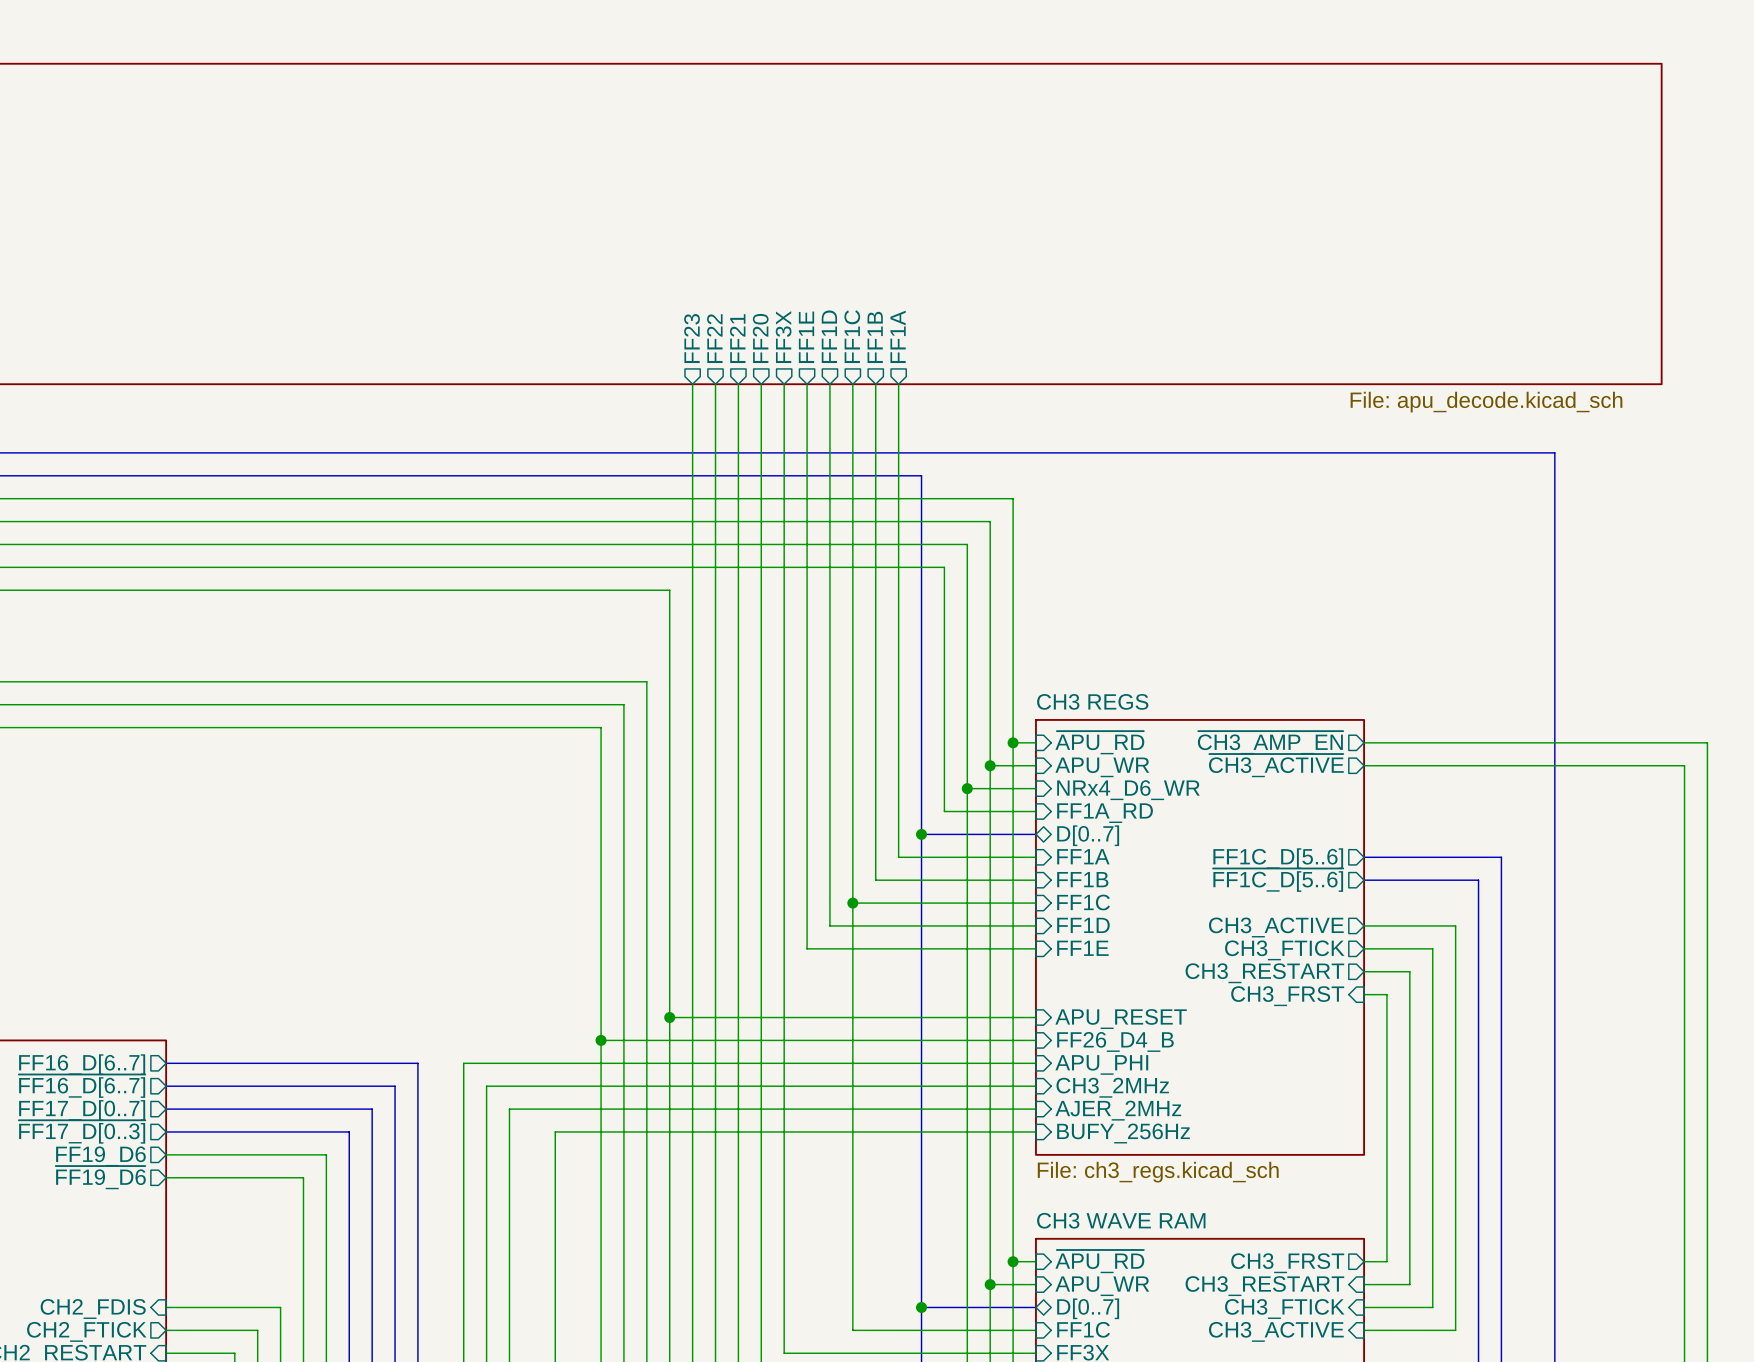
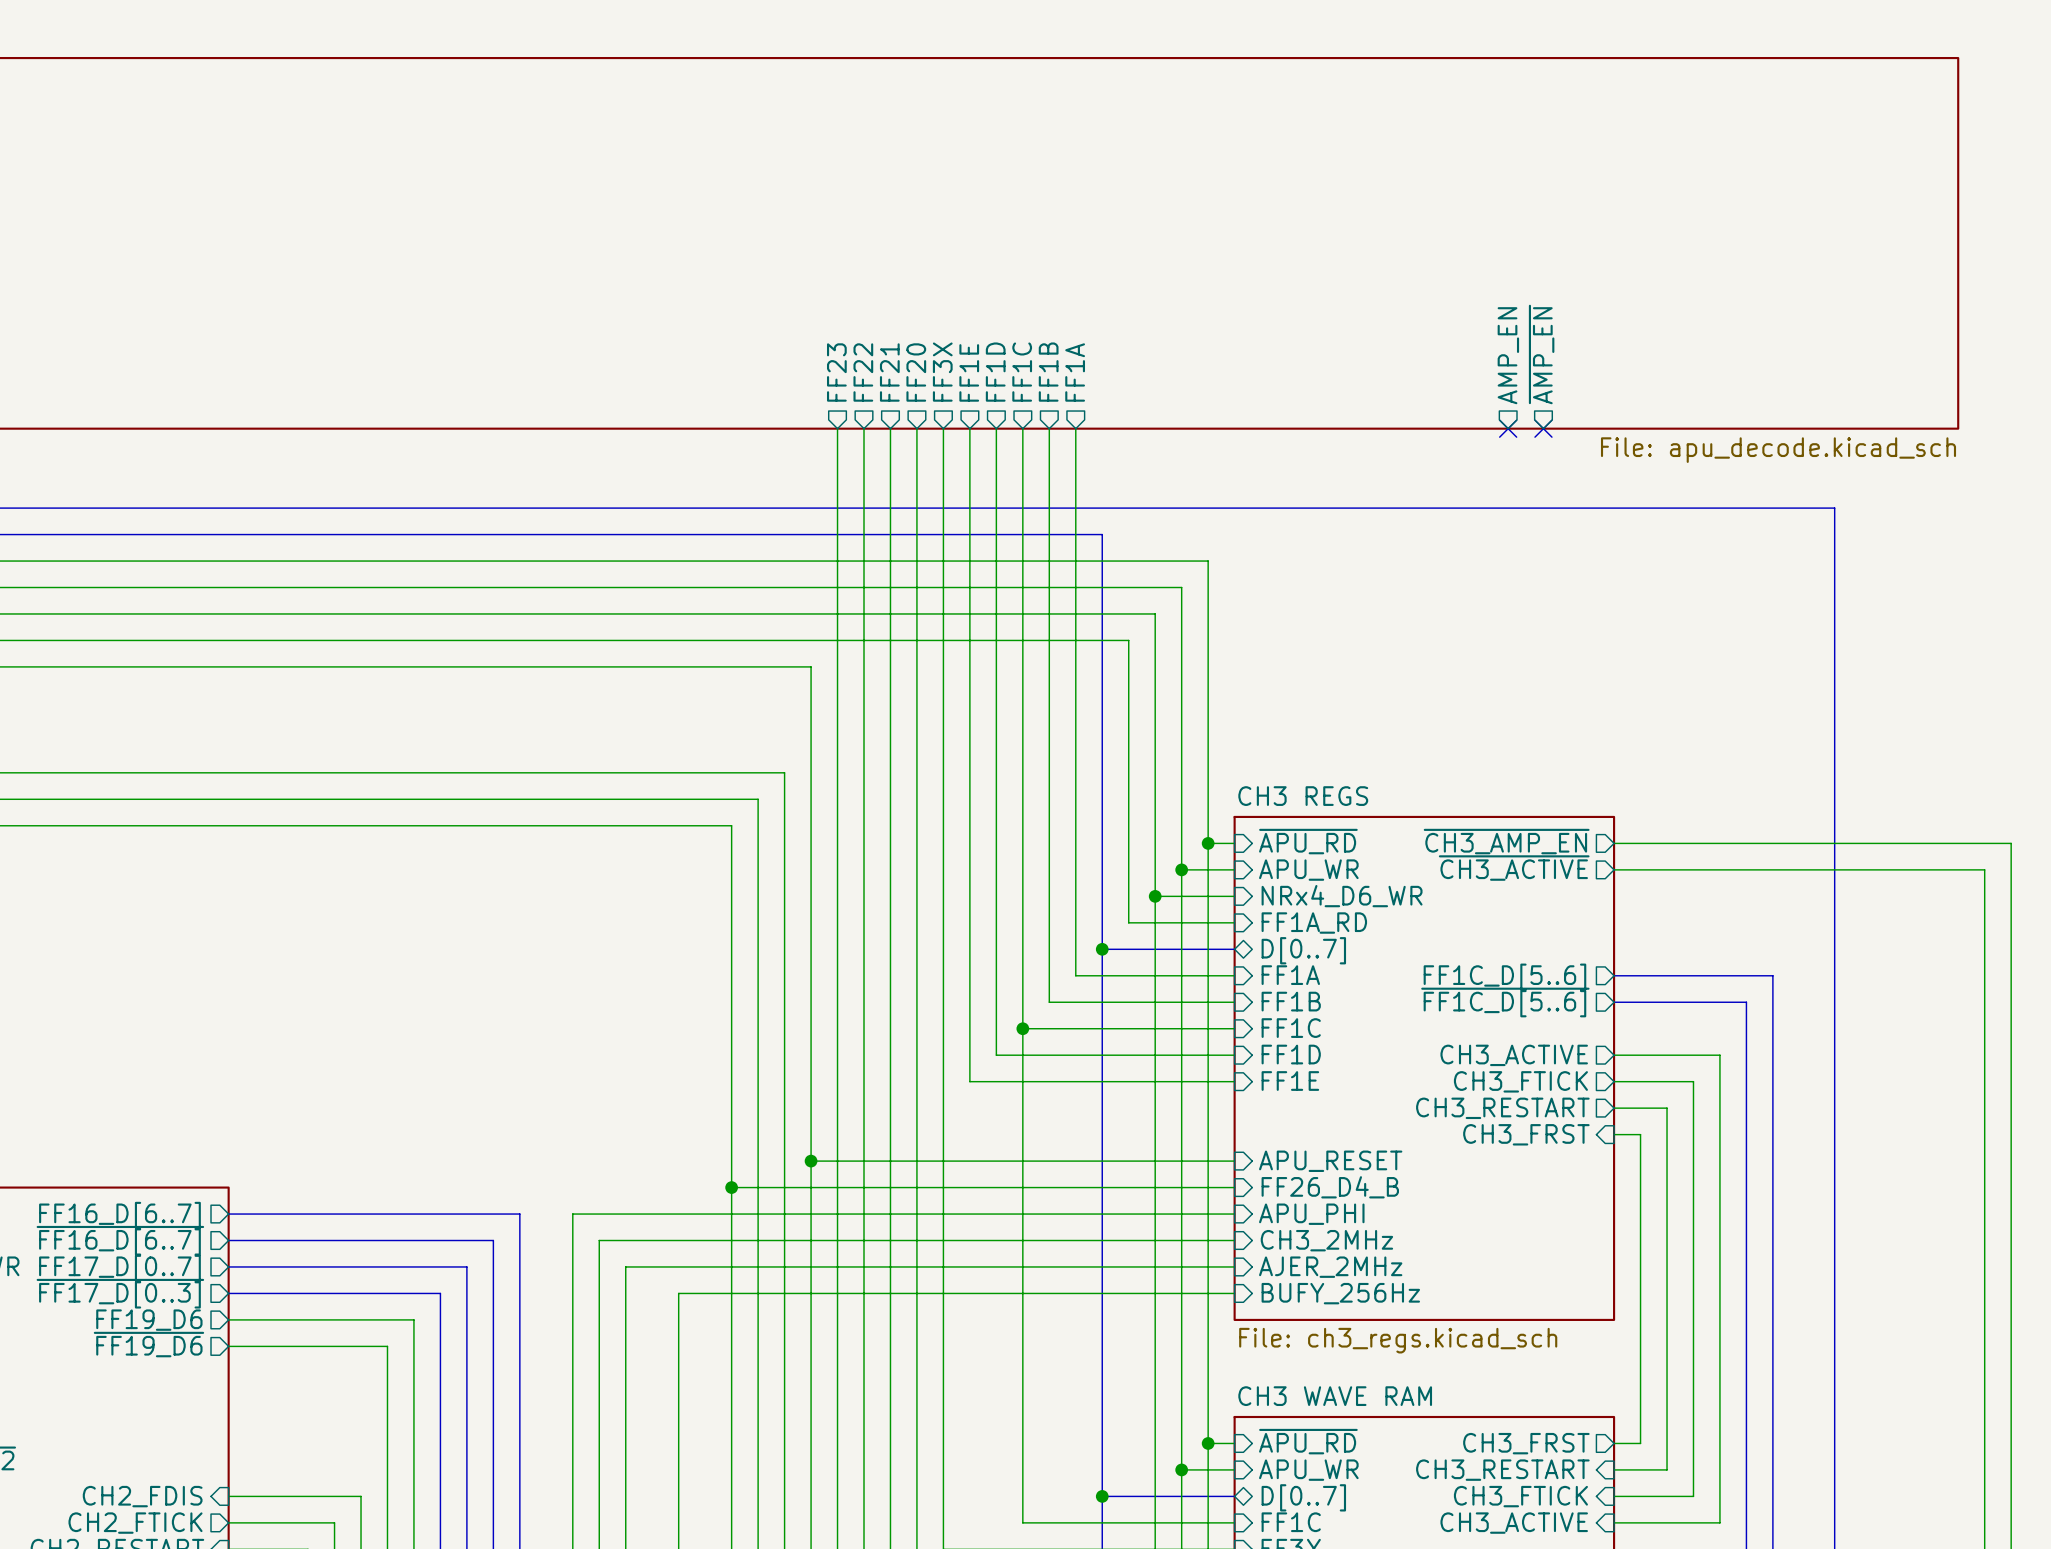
sheet pin: none -> ~{AMP_EN} (1541, 354)
sheet pin: none -> AMP_EN (1508, 355)
no-connect mark: none -> (1508, 428)
no-connect mark: none -> (1543, 428)

